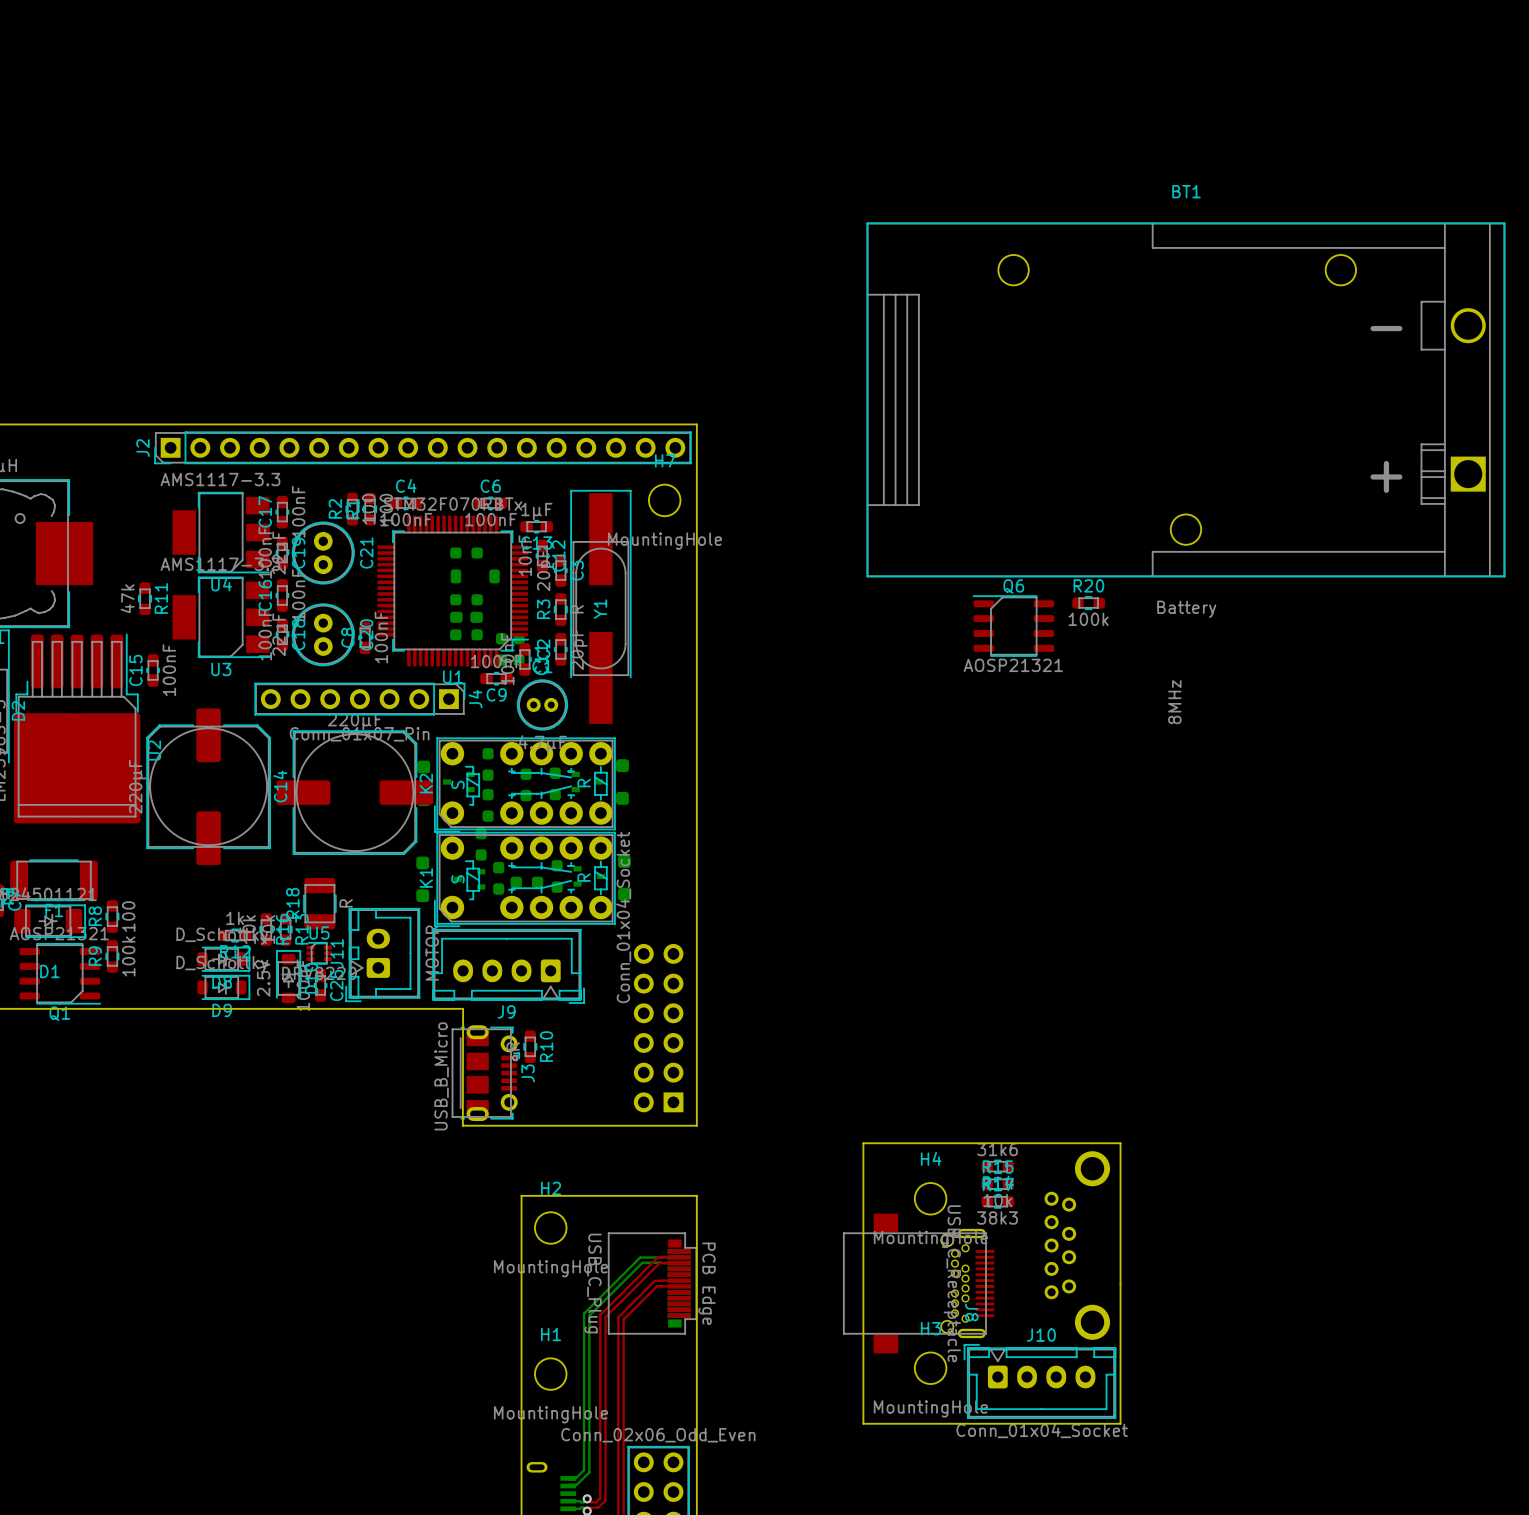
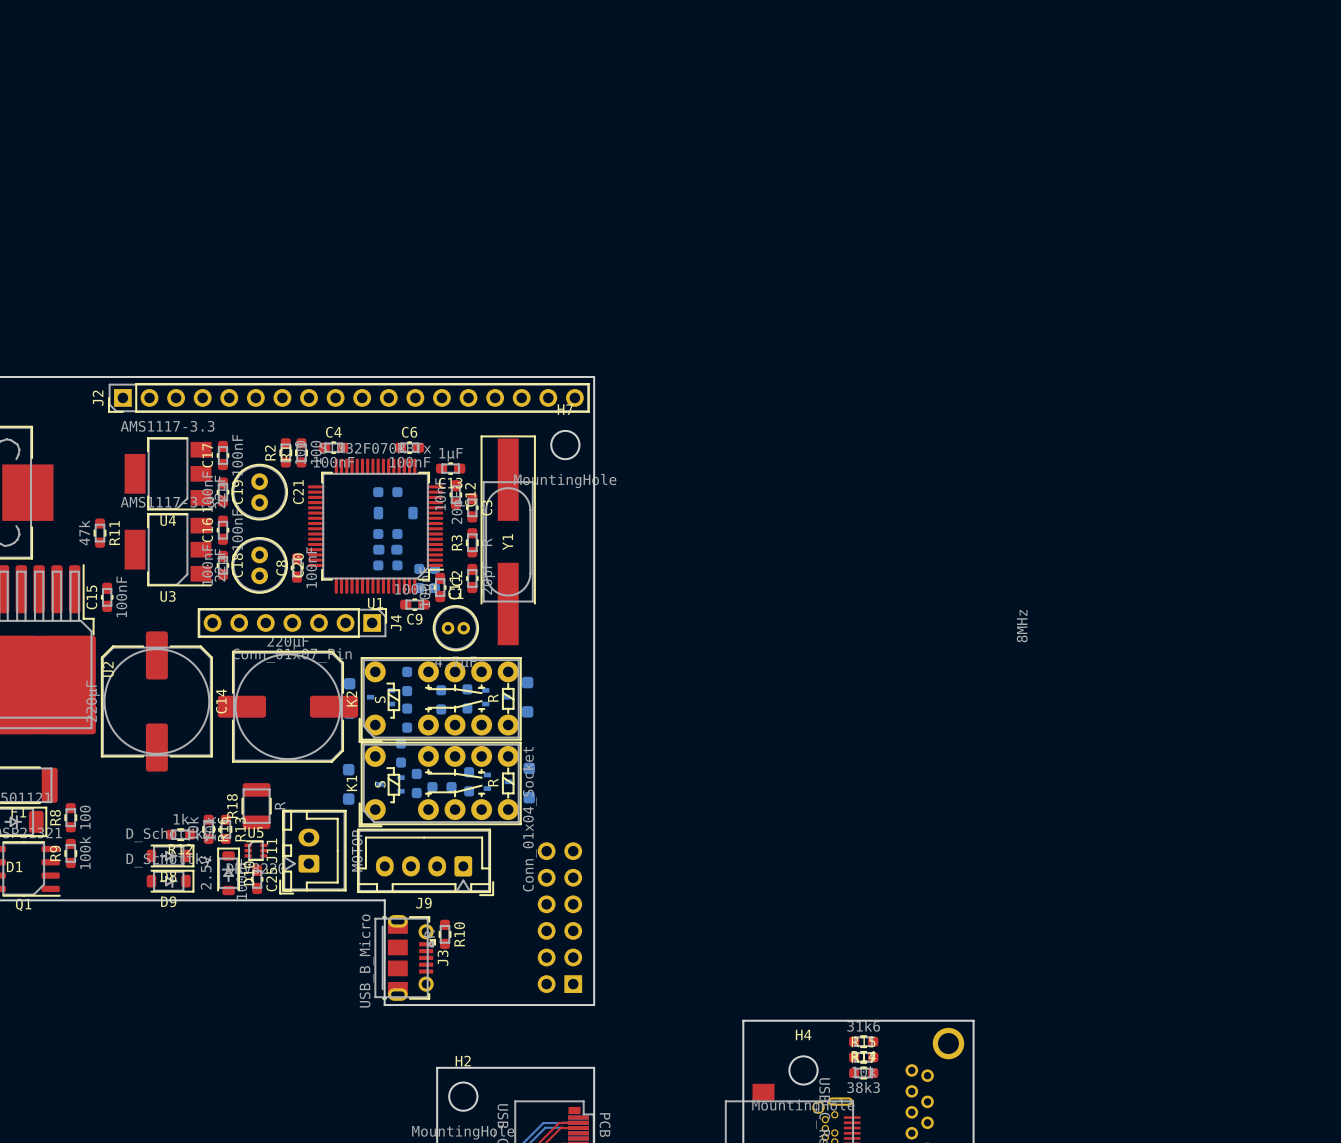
BT1: Battery (1185, 399) -> none
R20: 100k (1088, 603) -> none
Q6: AOSP21321 (1013, 626) -> none

